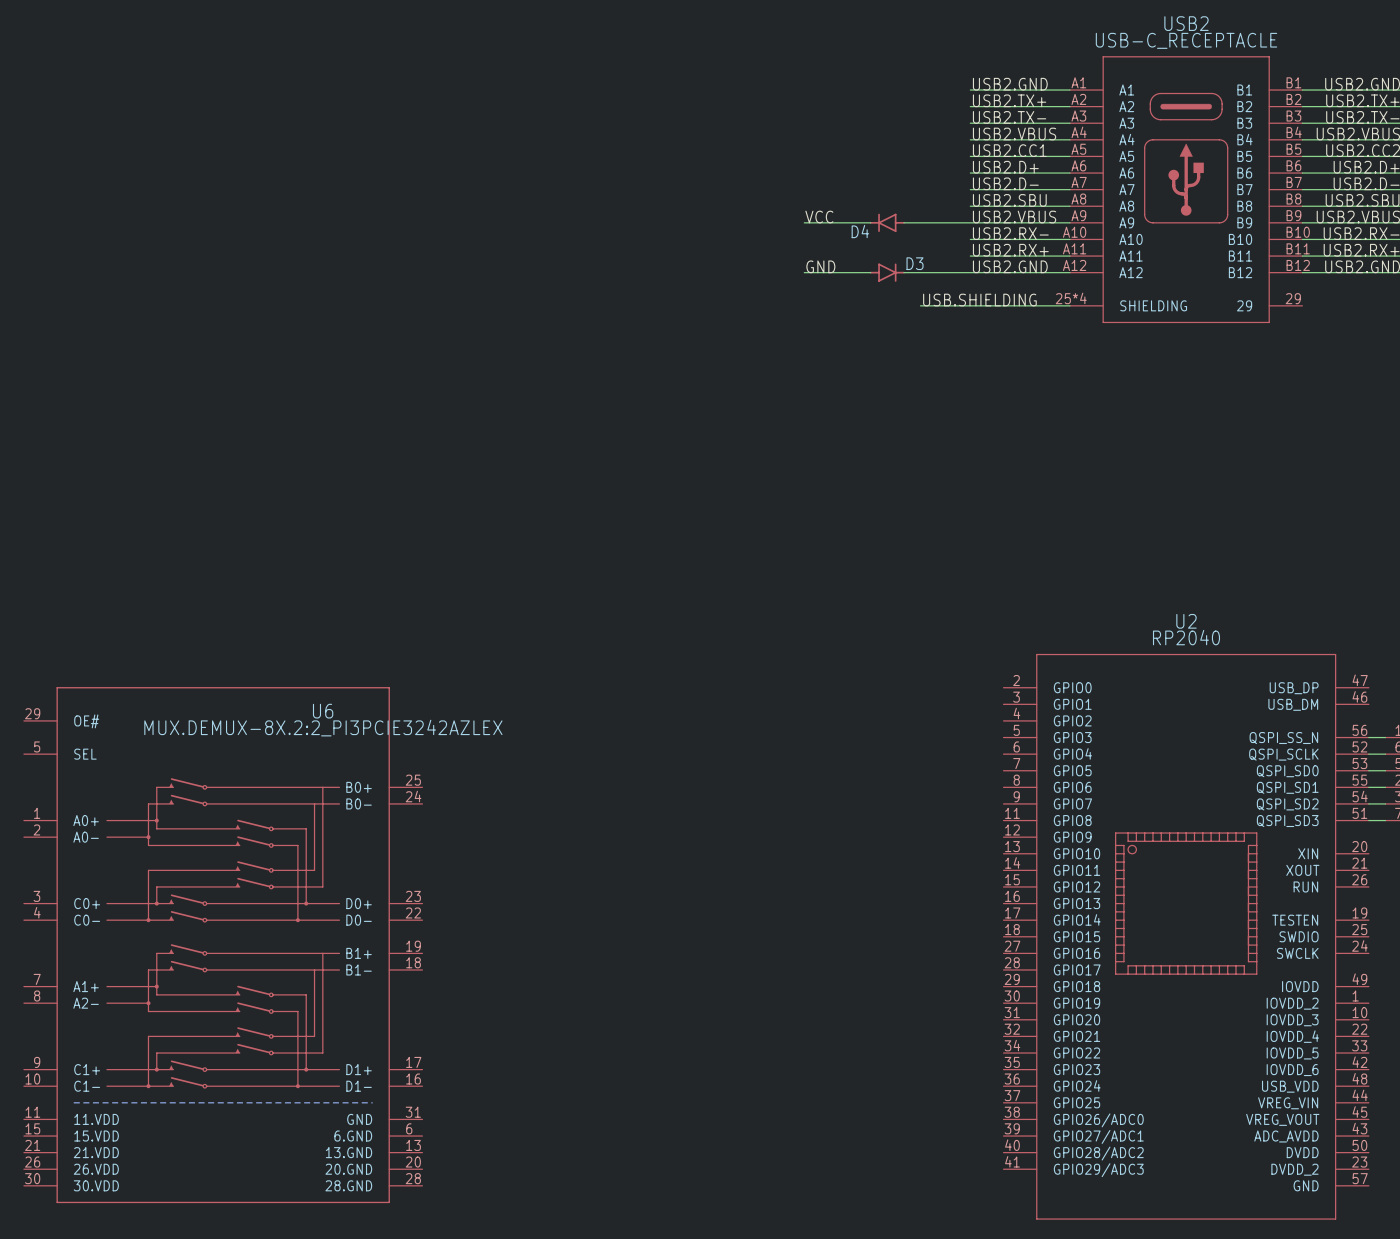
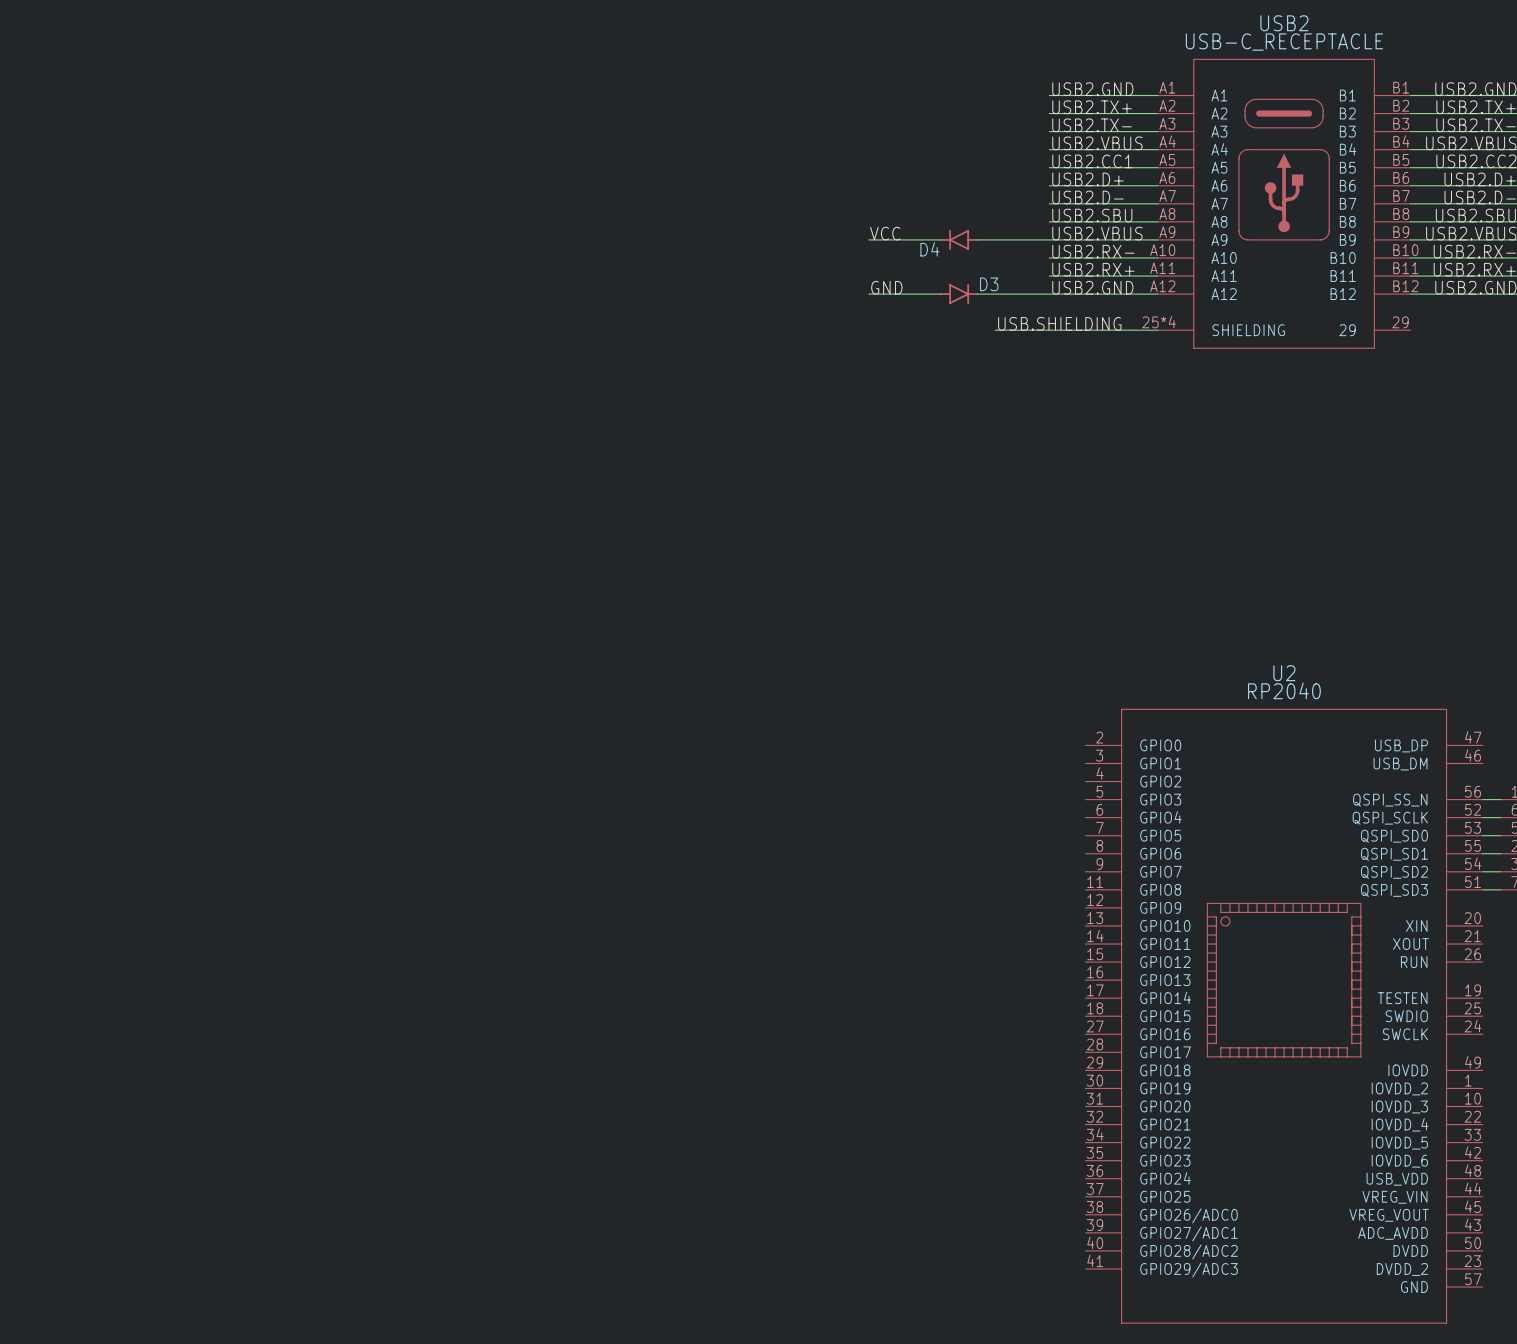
U6: MUX.DEMUX-8X.2:2_PI3PCIE3242AZLEX (223, 945) -> none

